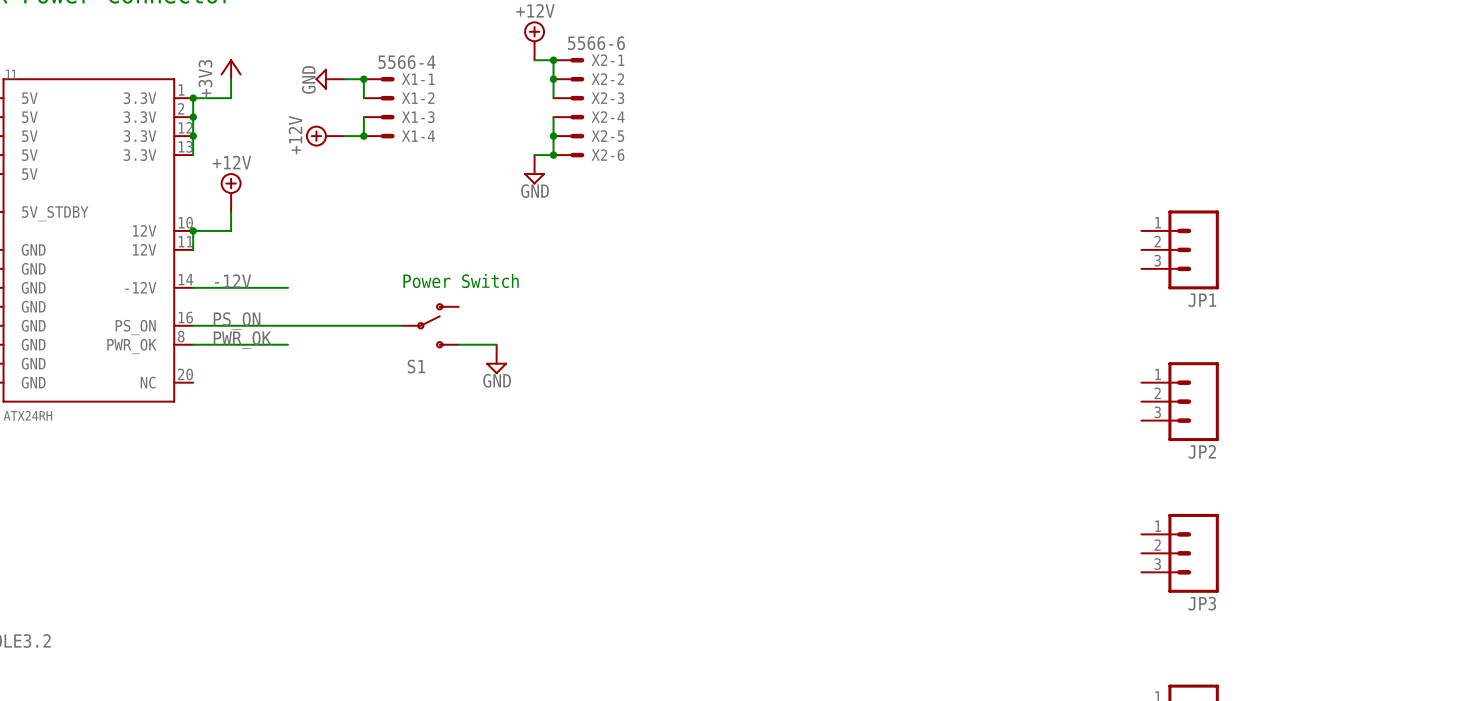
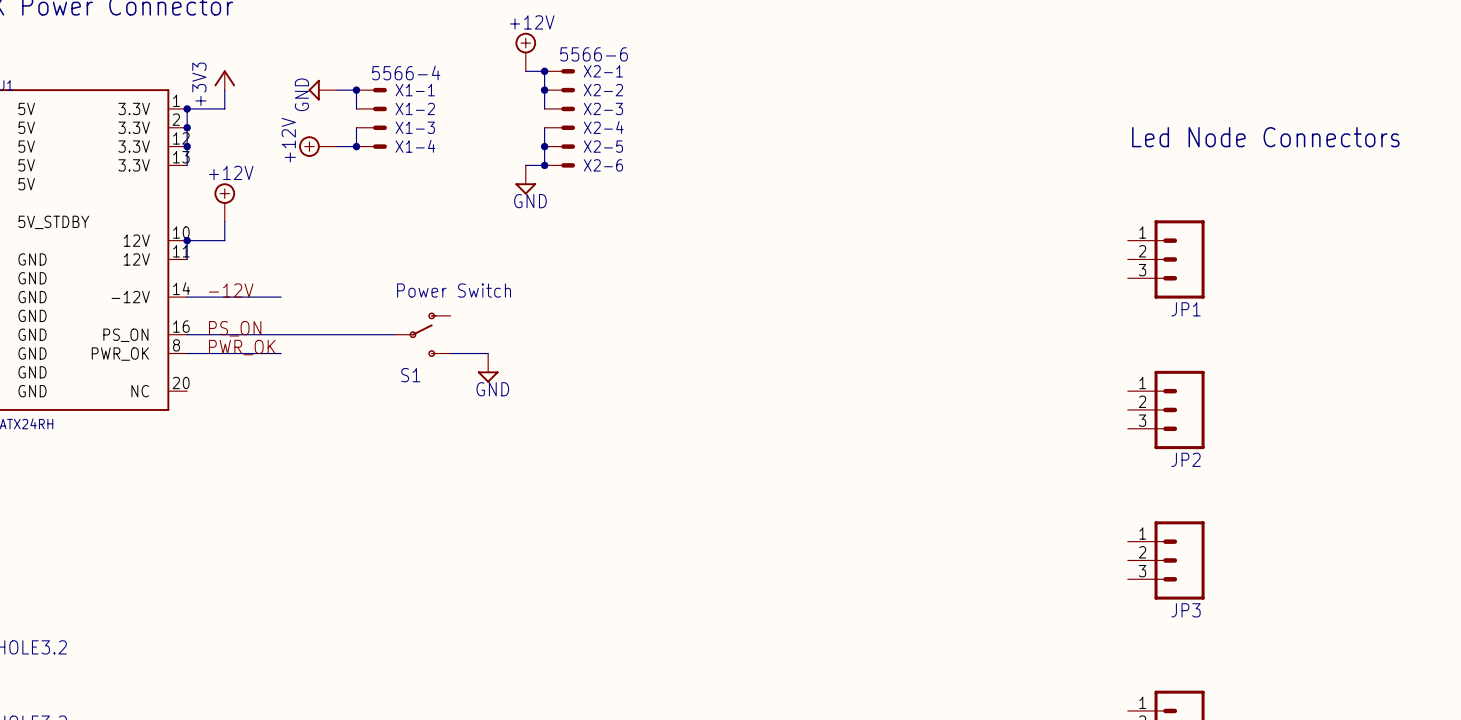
text: none -> Led Node Connectors (1265, 137)

